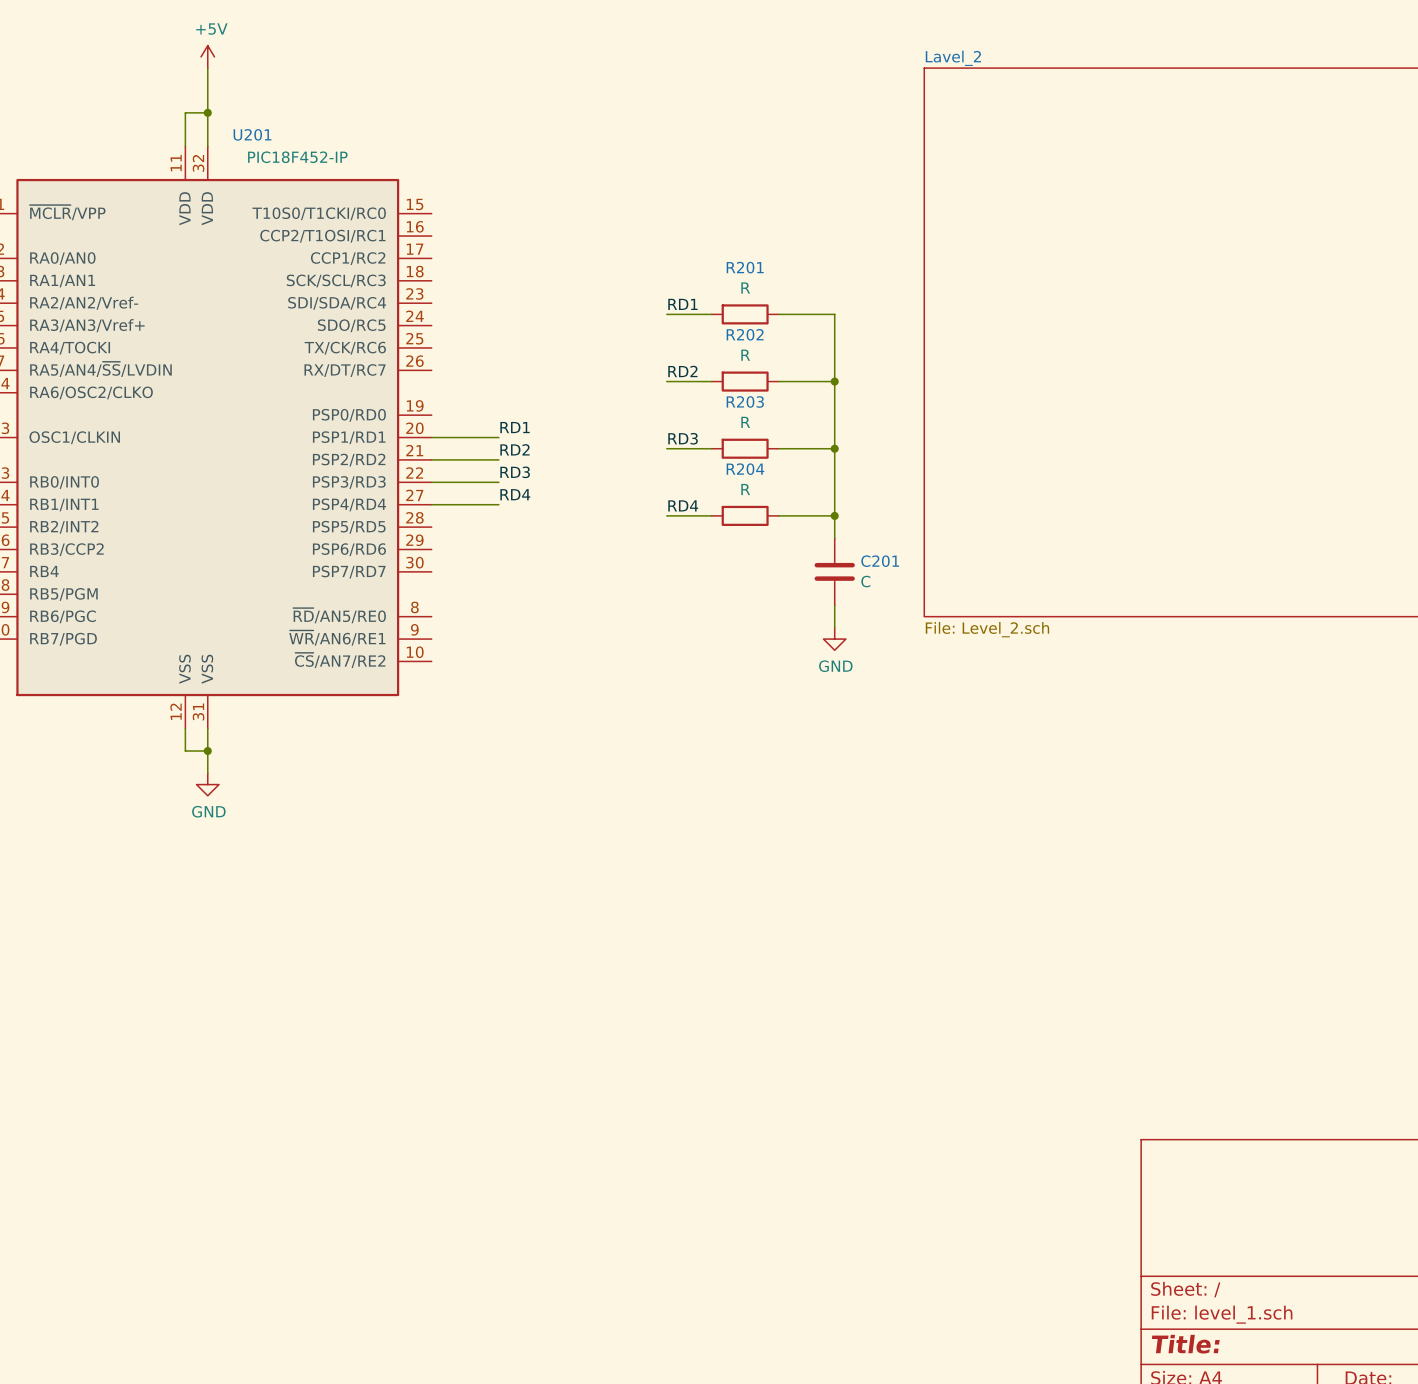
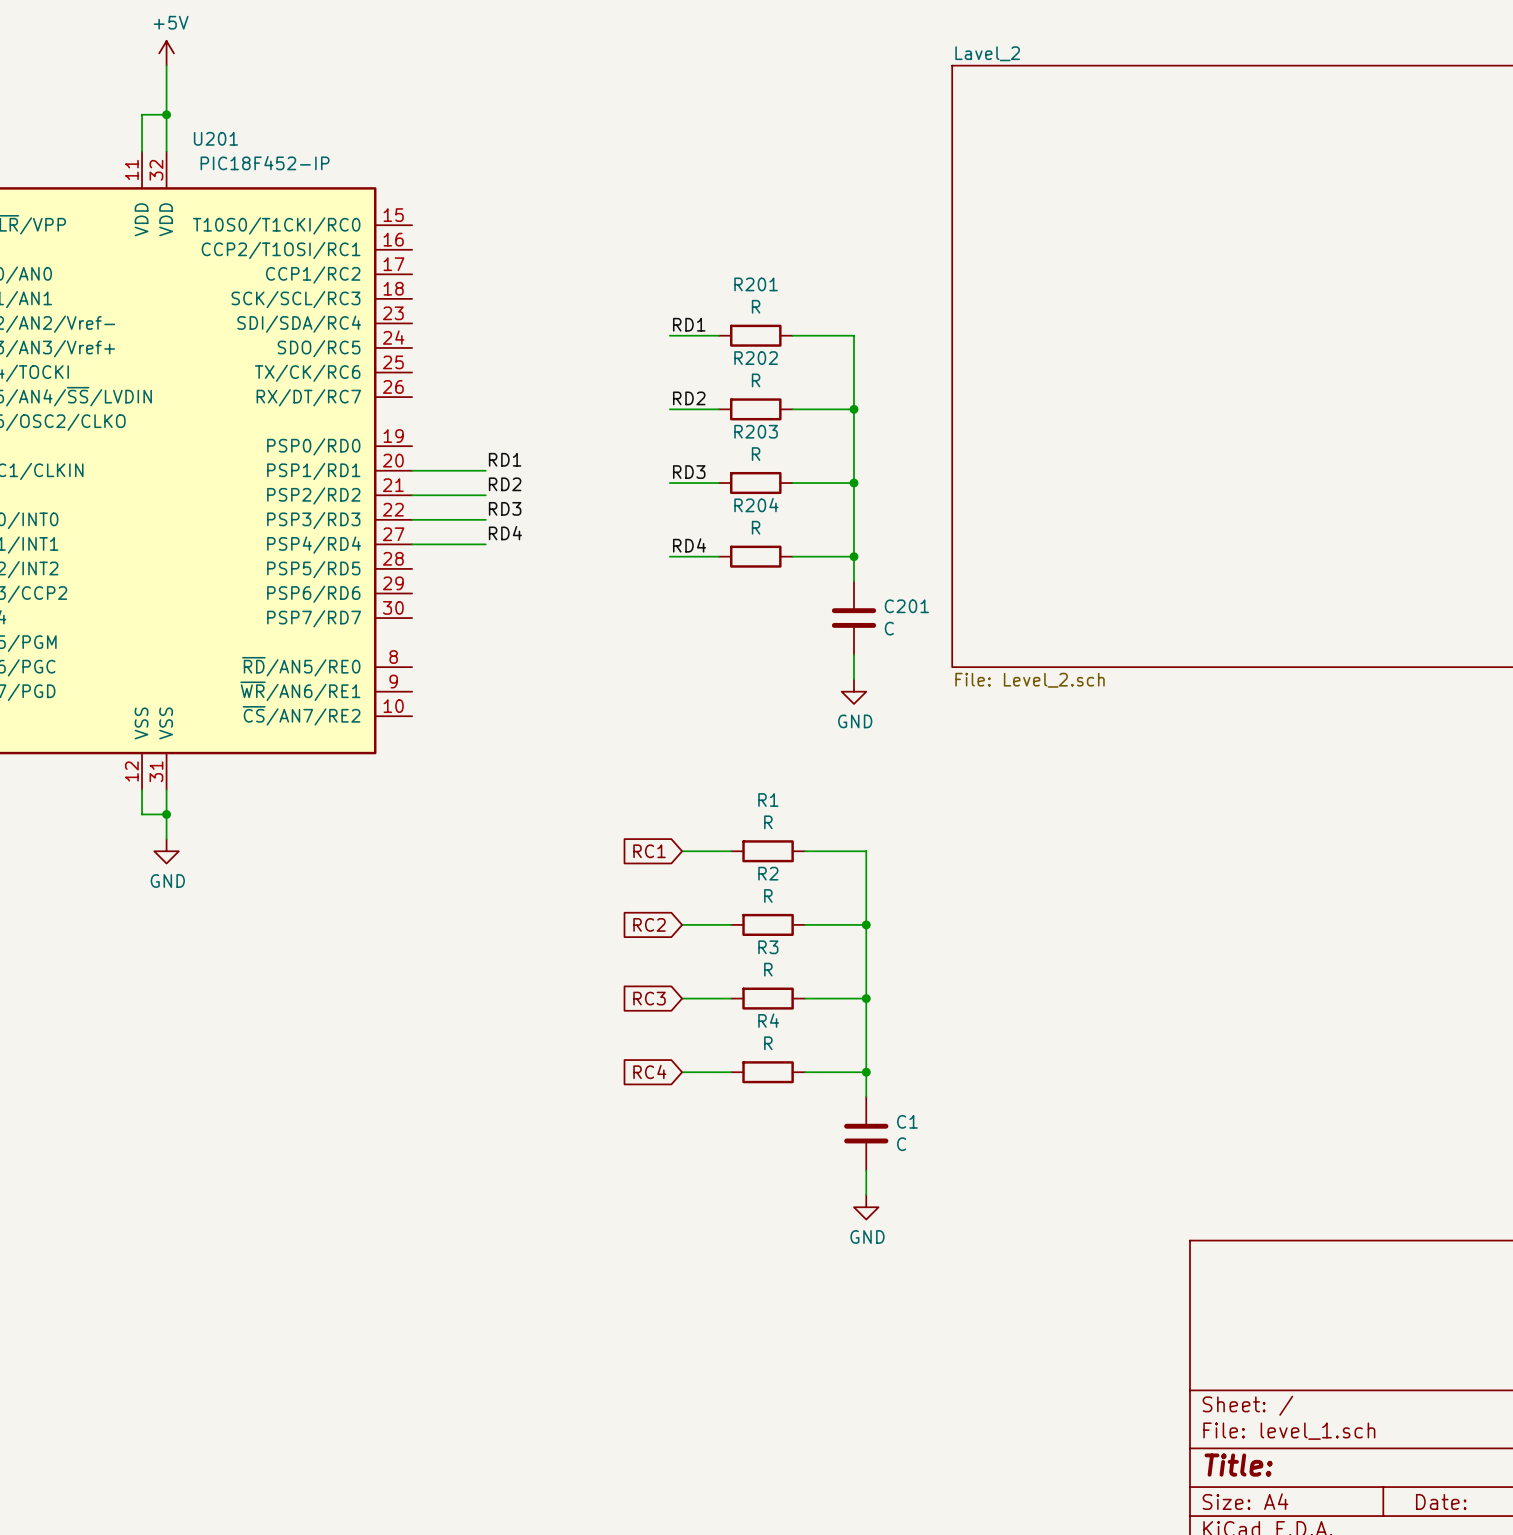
global label: none -> RC1 (649, 851)
wire: none -> (682, 851) (731, 851)
R1: none -> R (768, 851)
wire: none -> (804, 851) (866, 851) (866, 1096)
global label: none -> RC2 (649, 924)
wire: none -> (682, 924) (731, 924)
R2: none -> R (768, 924)
wire: none -> (804, 924) (866, 924)
junction: none -> (866, 924)
global label: none -> RC3 (649, 998)
wire: none -> (682, 998) (731, 998)
R3: none -> R (768, 998)
wire: none -> (804, 998) (866, 998)
junction: none -> (866, 998)
global label: none -> RC4 (649, 1071)
wire: none -> (682, 1072) (731, 1072)
R4: none -> R (768, 1072)
wire: none -> (804, 1072) (866, 1072)
junction: none -> (866, 1072)
C1: none -> C (866, 1133)
wire: none -> (866, 1170) (866, 1194)
power symbol: none -> GND (866, 1207)

